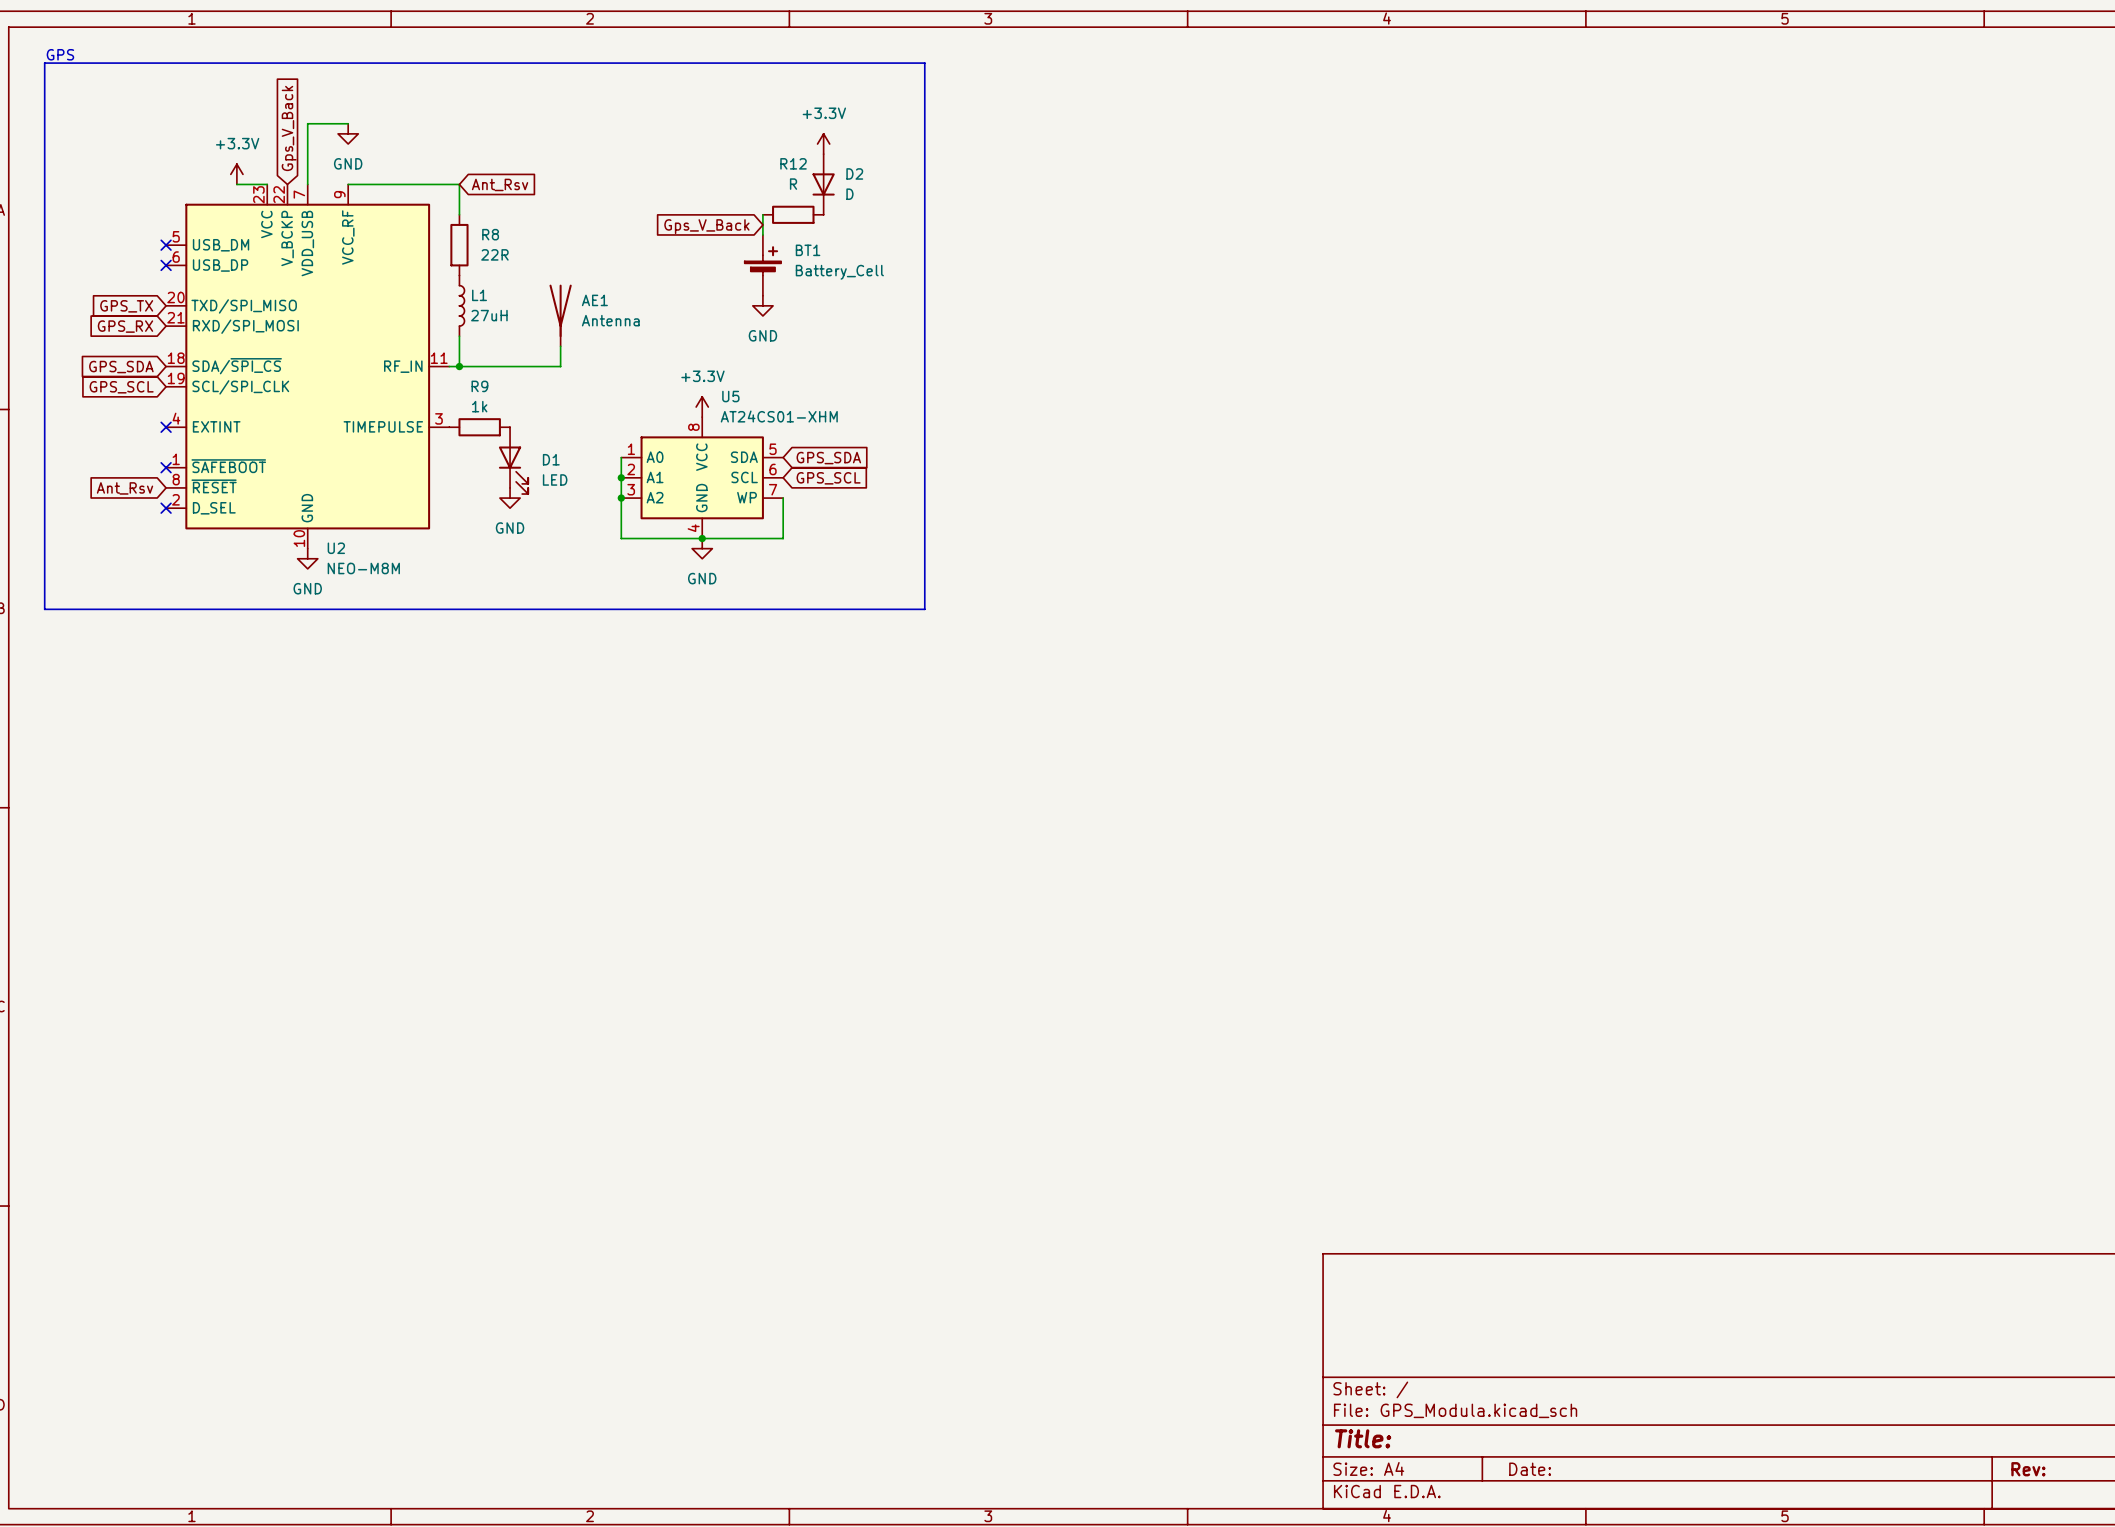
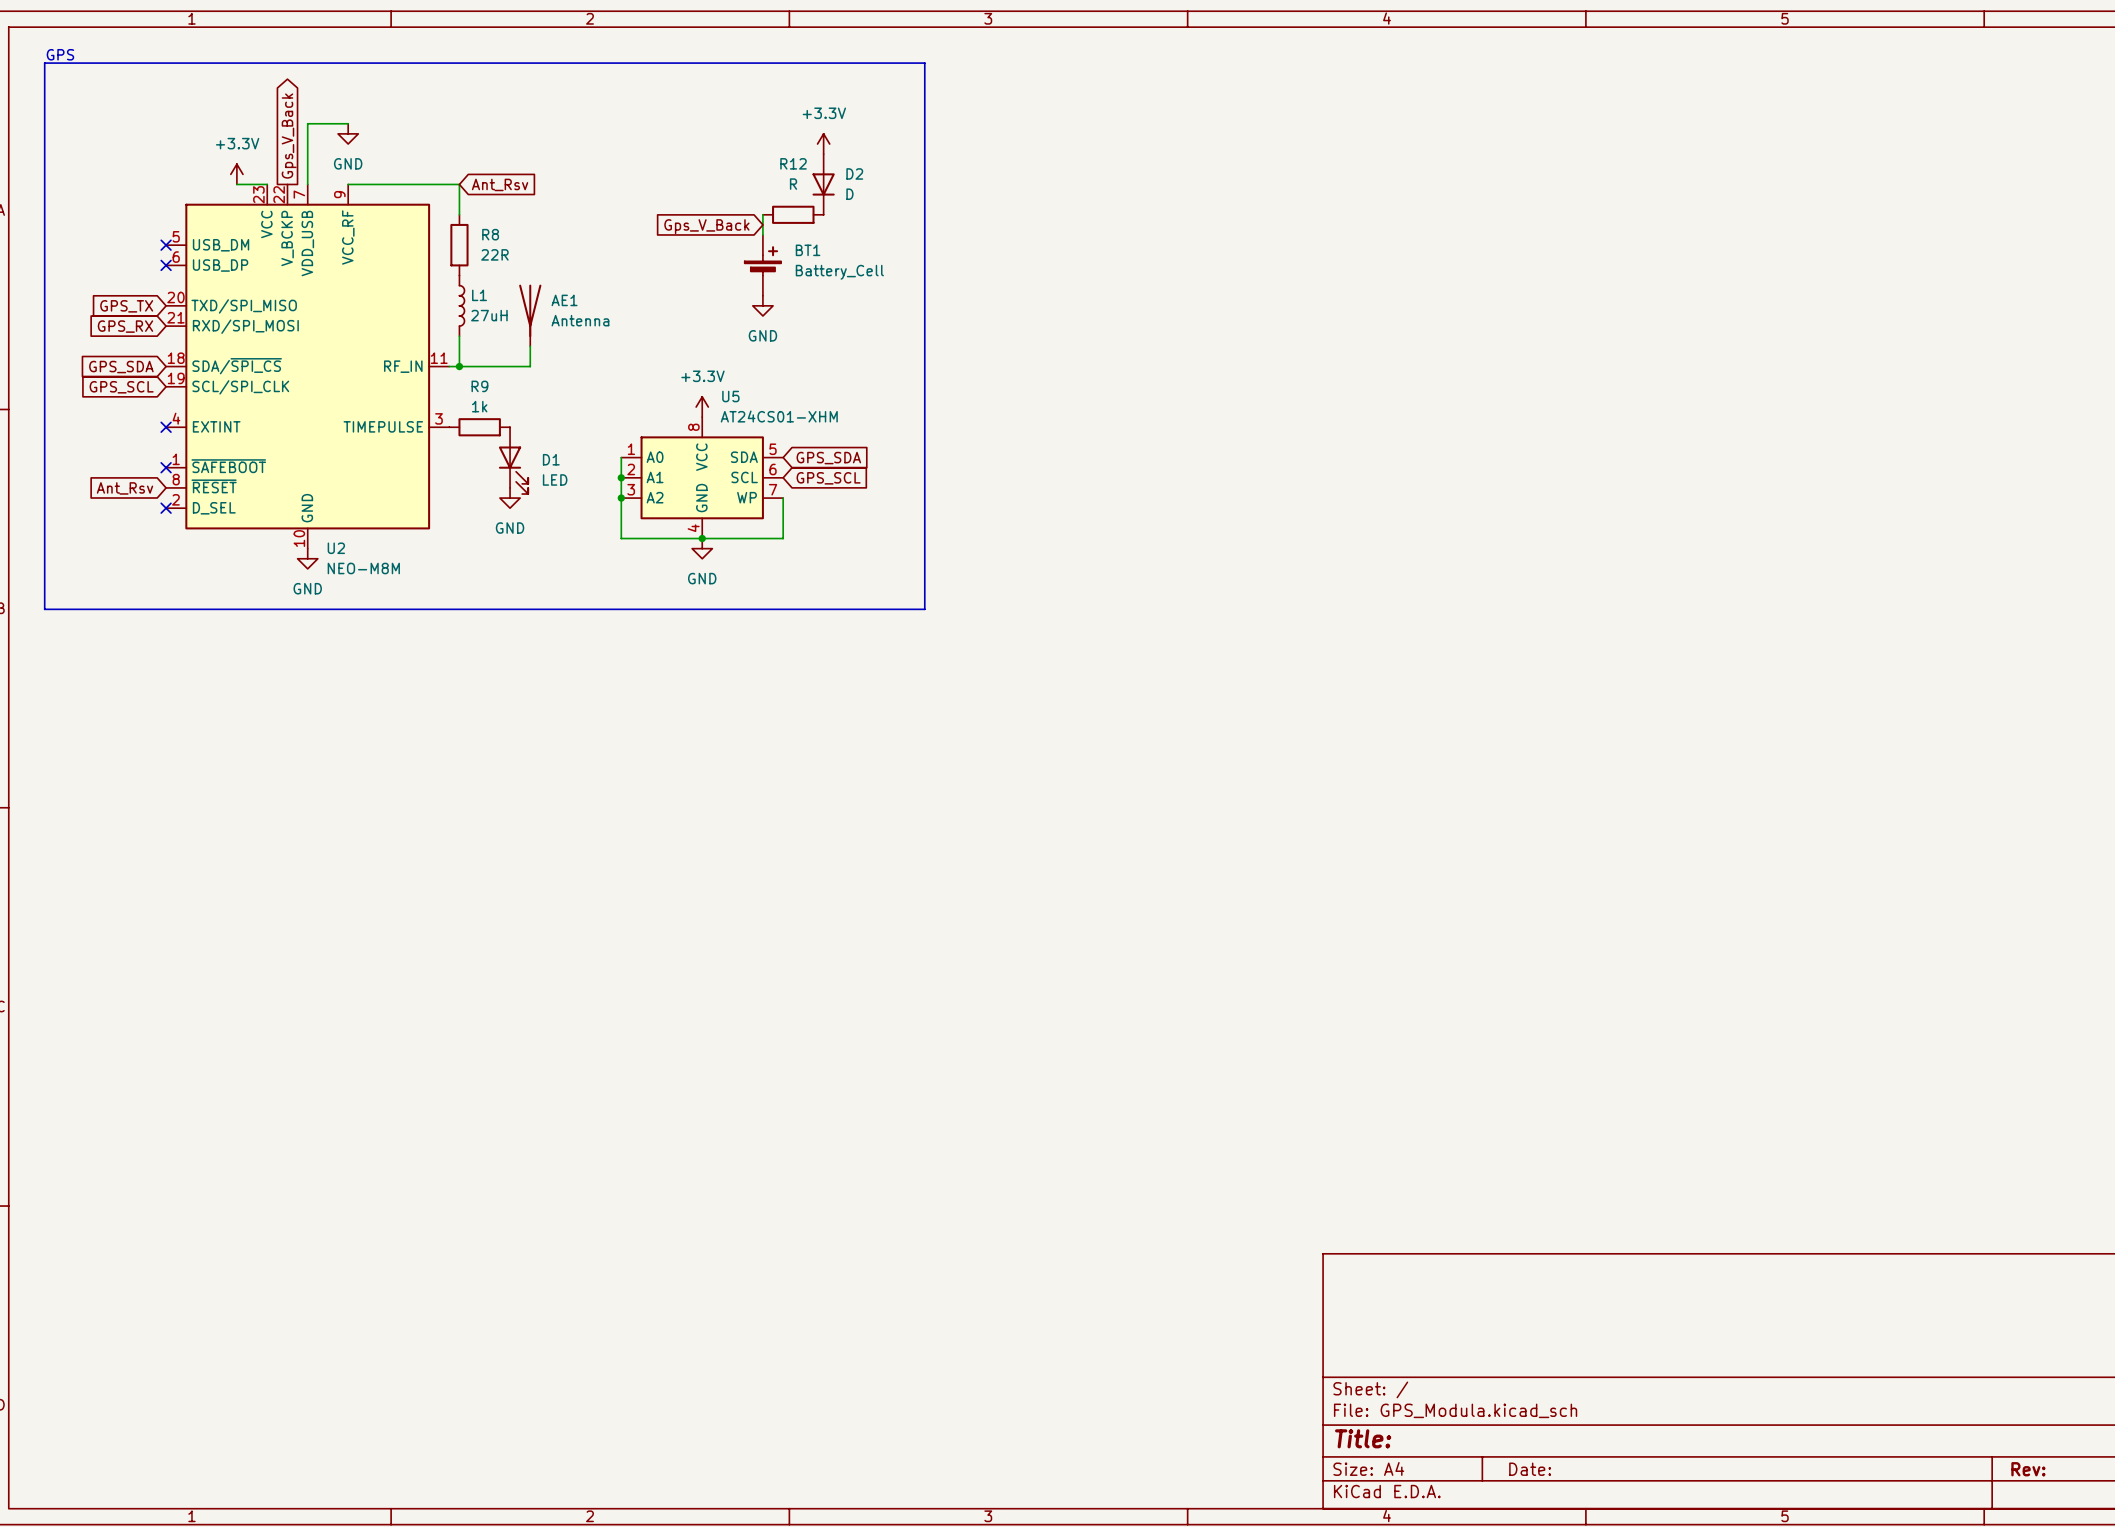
global label shape: input (289, 128) -> output (289, 136)
AE1 position: (560, 315) -> (530, 315)
wire: (560, 346) (560, 366) (530, 366) -> (530, 346) (530, 366)

